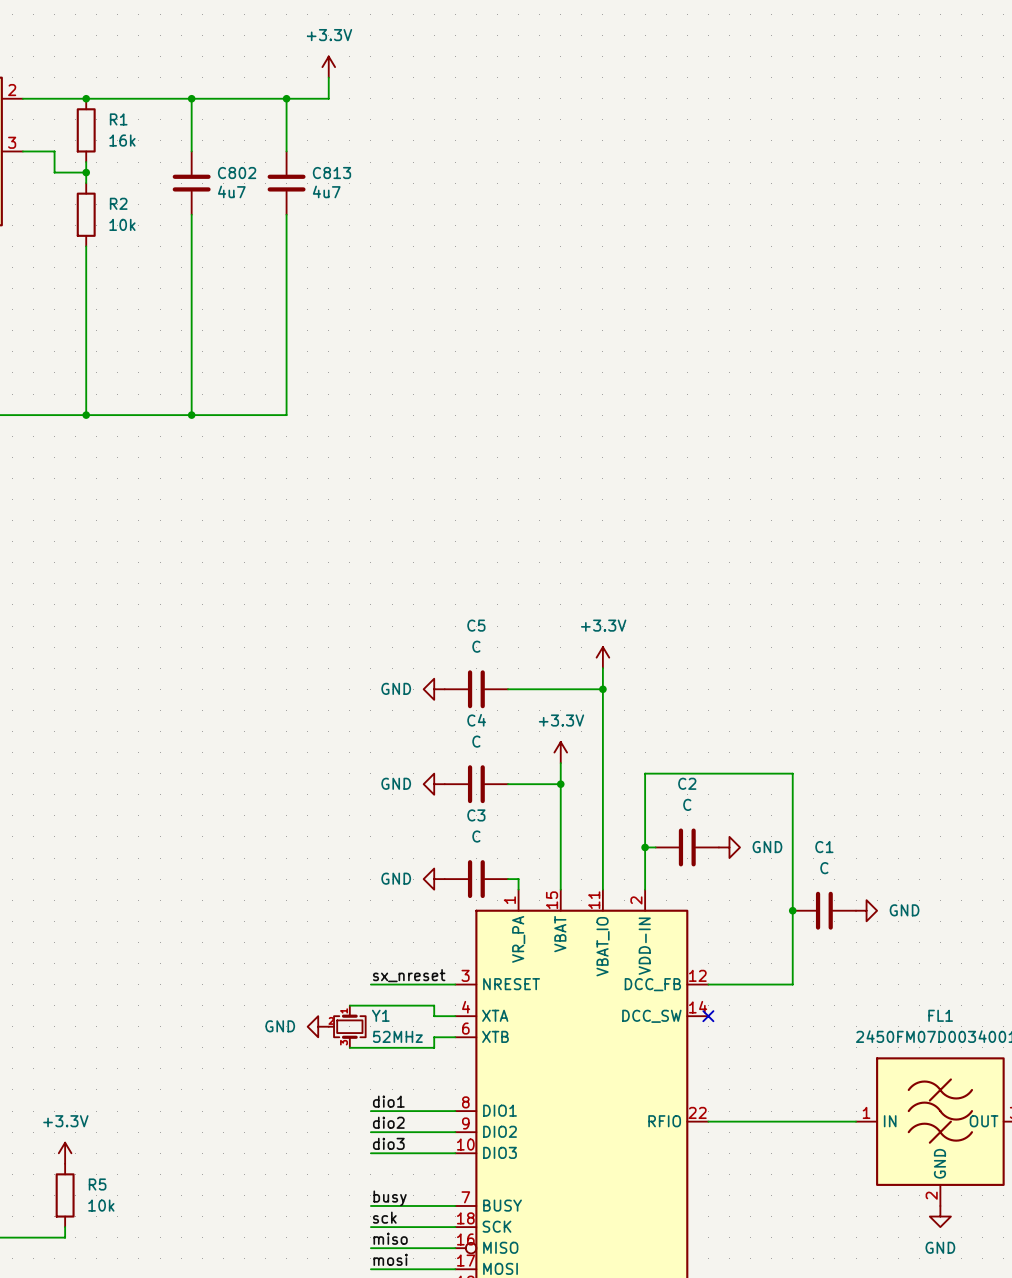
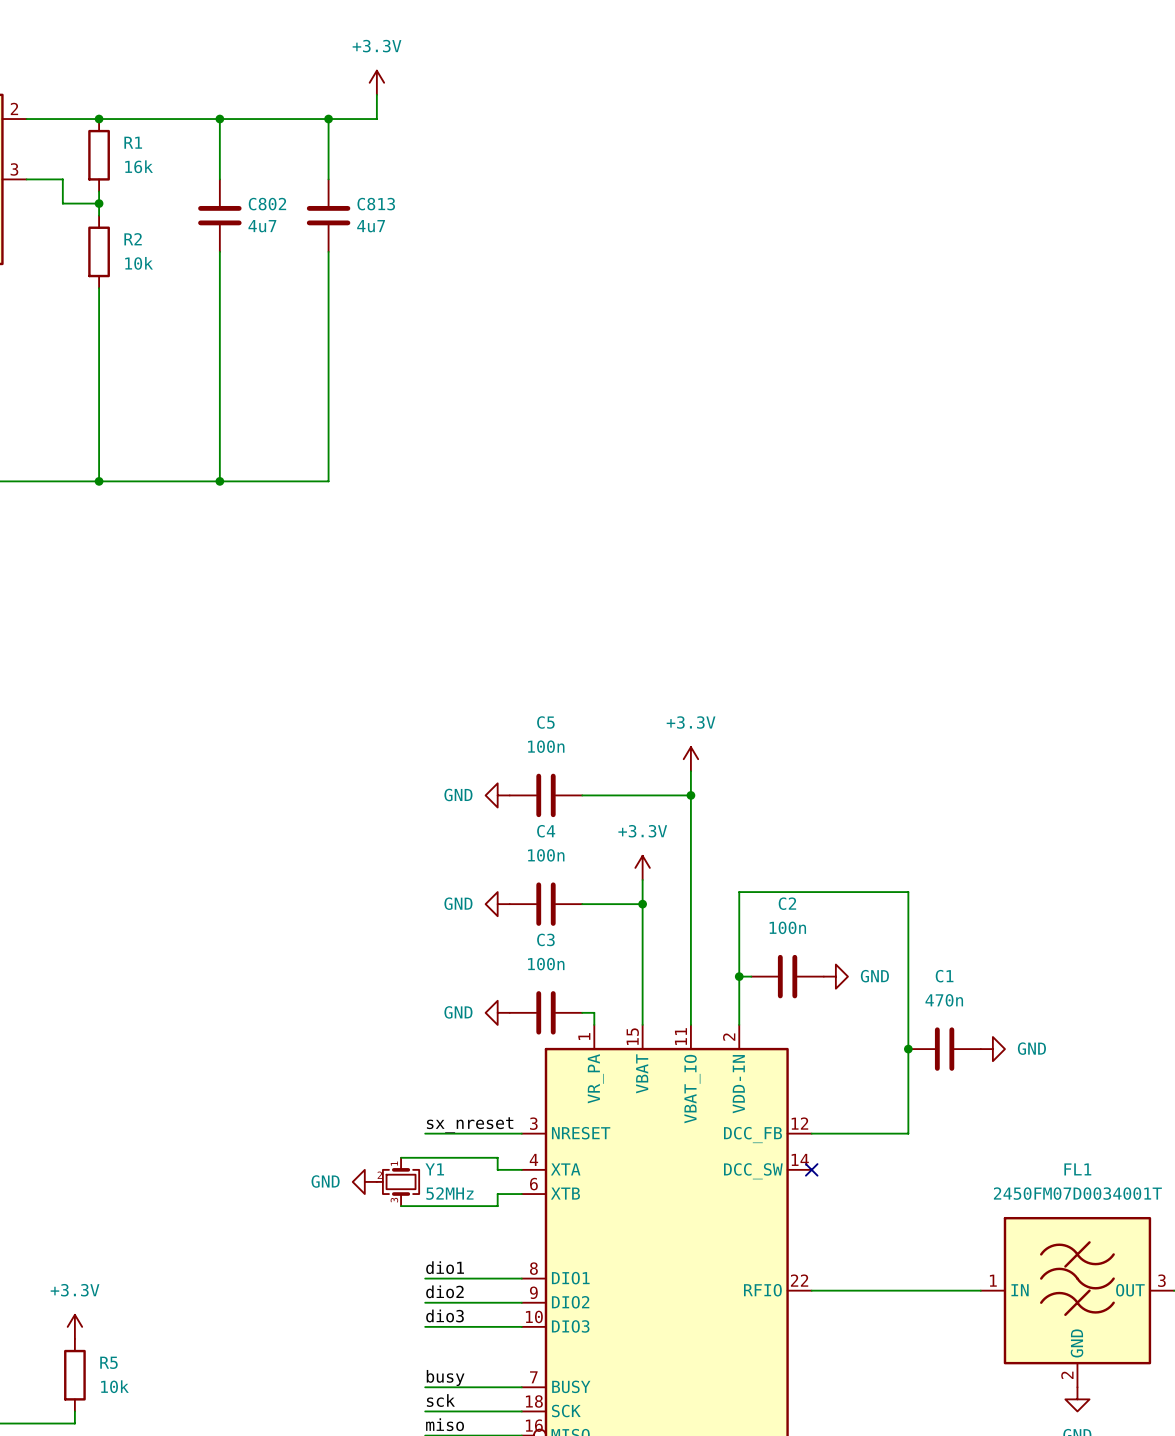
C5 value: C (476, 646) -> 100n (546, 746)
C4 value: C (476, 741) -> 100n (546, 855)
C2 value: C (687, 804) -> 100n (787, 927)
C3 value: C (476, 836) -> 100n (546, 964)
C1 value: C (824, 868) -> 470n (944, 1000)

